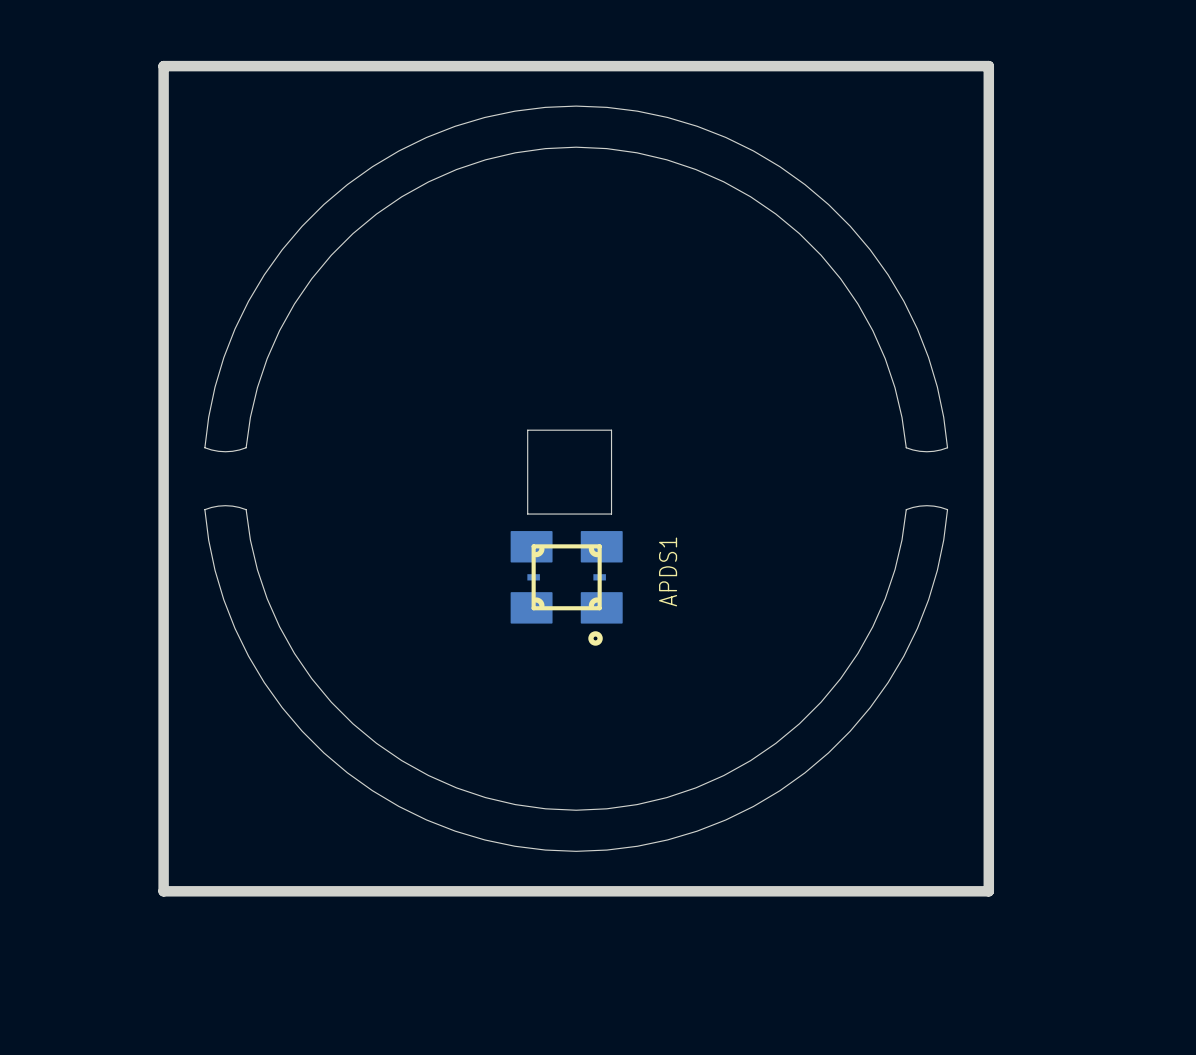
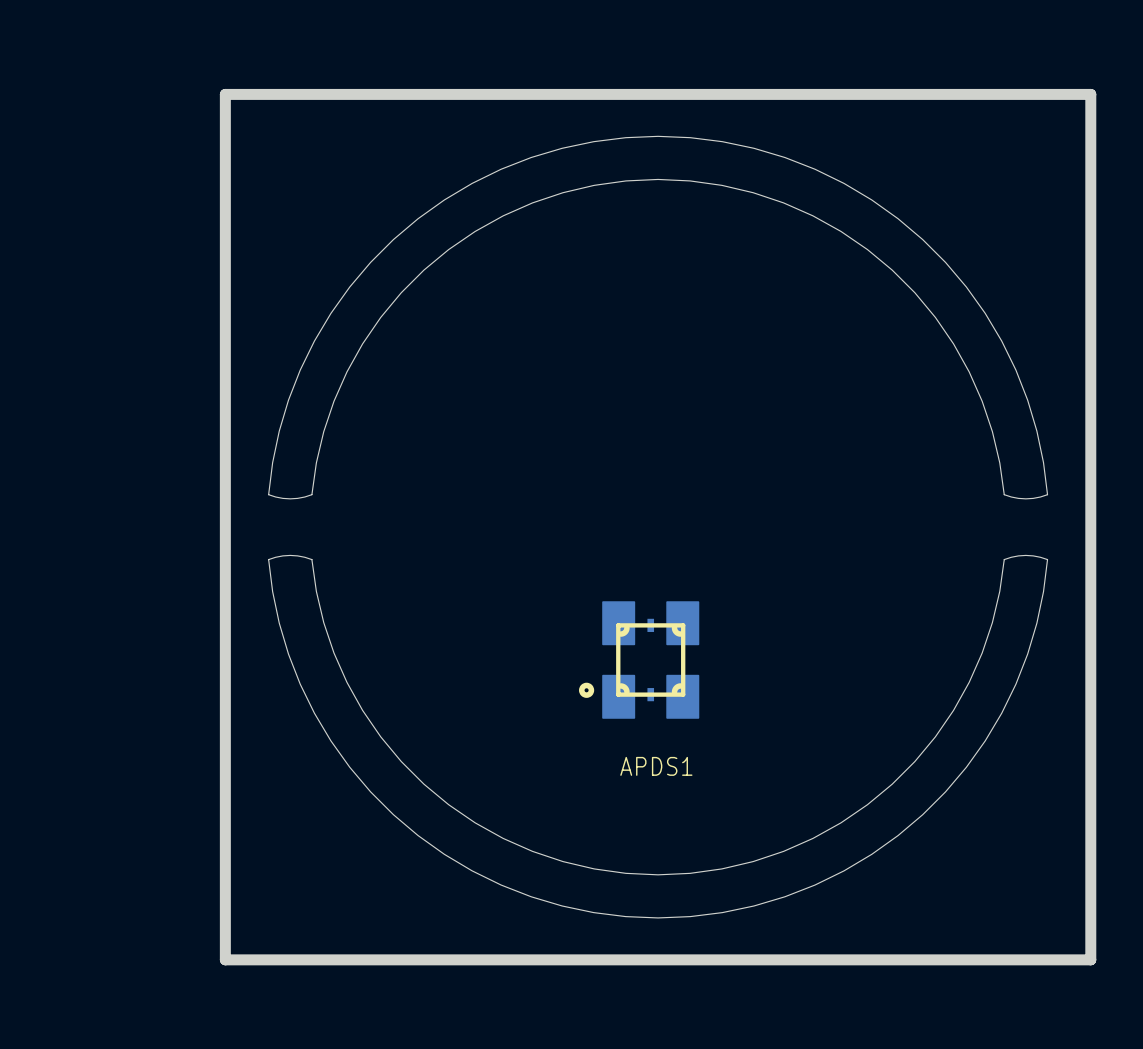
board edge: (611, 430) (611, 514) (527, 514) (527, 430) (611, 430) -> none
APDS1 rotation: 0° (566, 588) -> 90° clockwise (639, 660)

